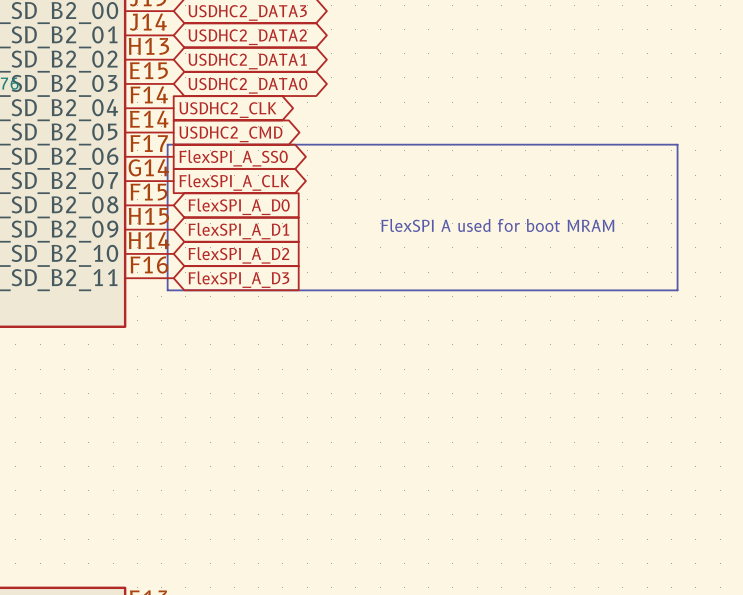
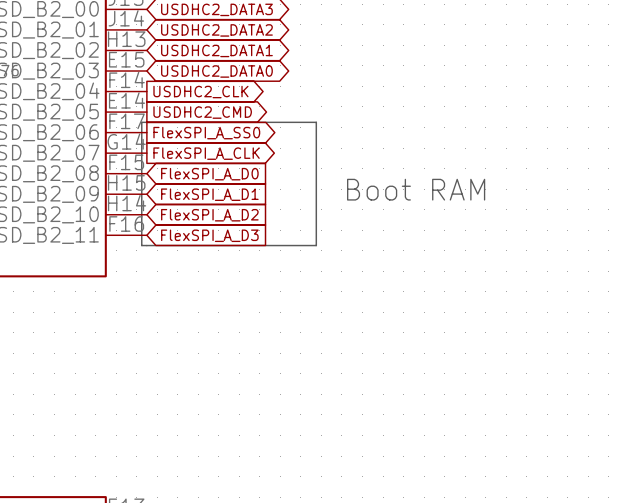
line: (374, 144) (677, 144) (677, 290) (374, 290) -> (316, 122) (316, 245)
text: none -> Boot RAM (416, 189)
text: FlexSPI A used for boot MRAM (497, 225) -> none

